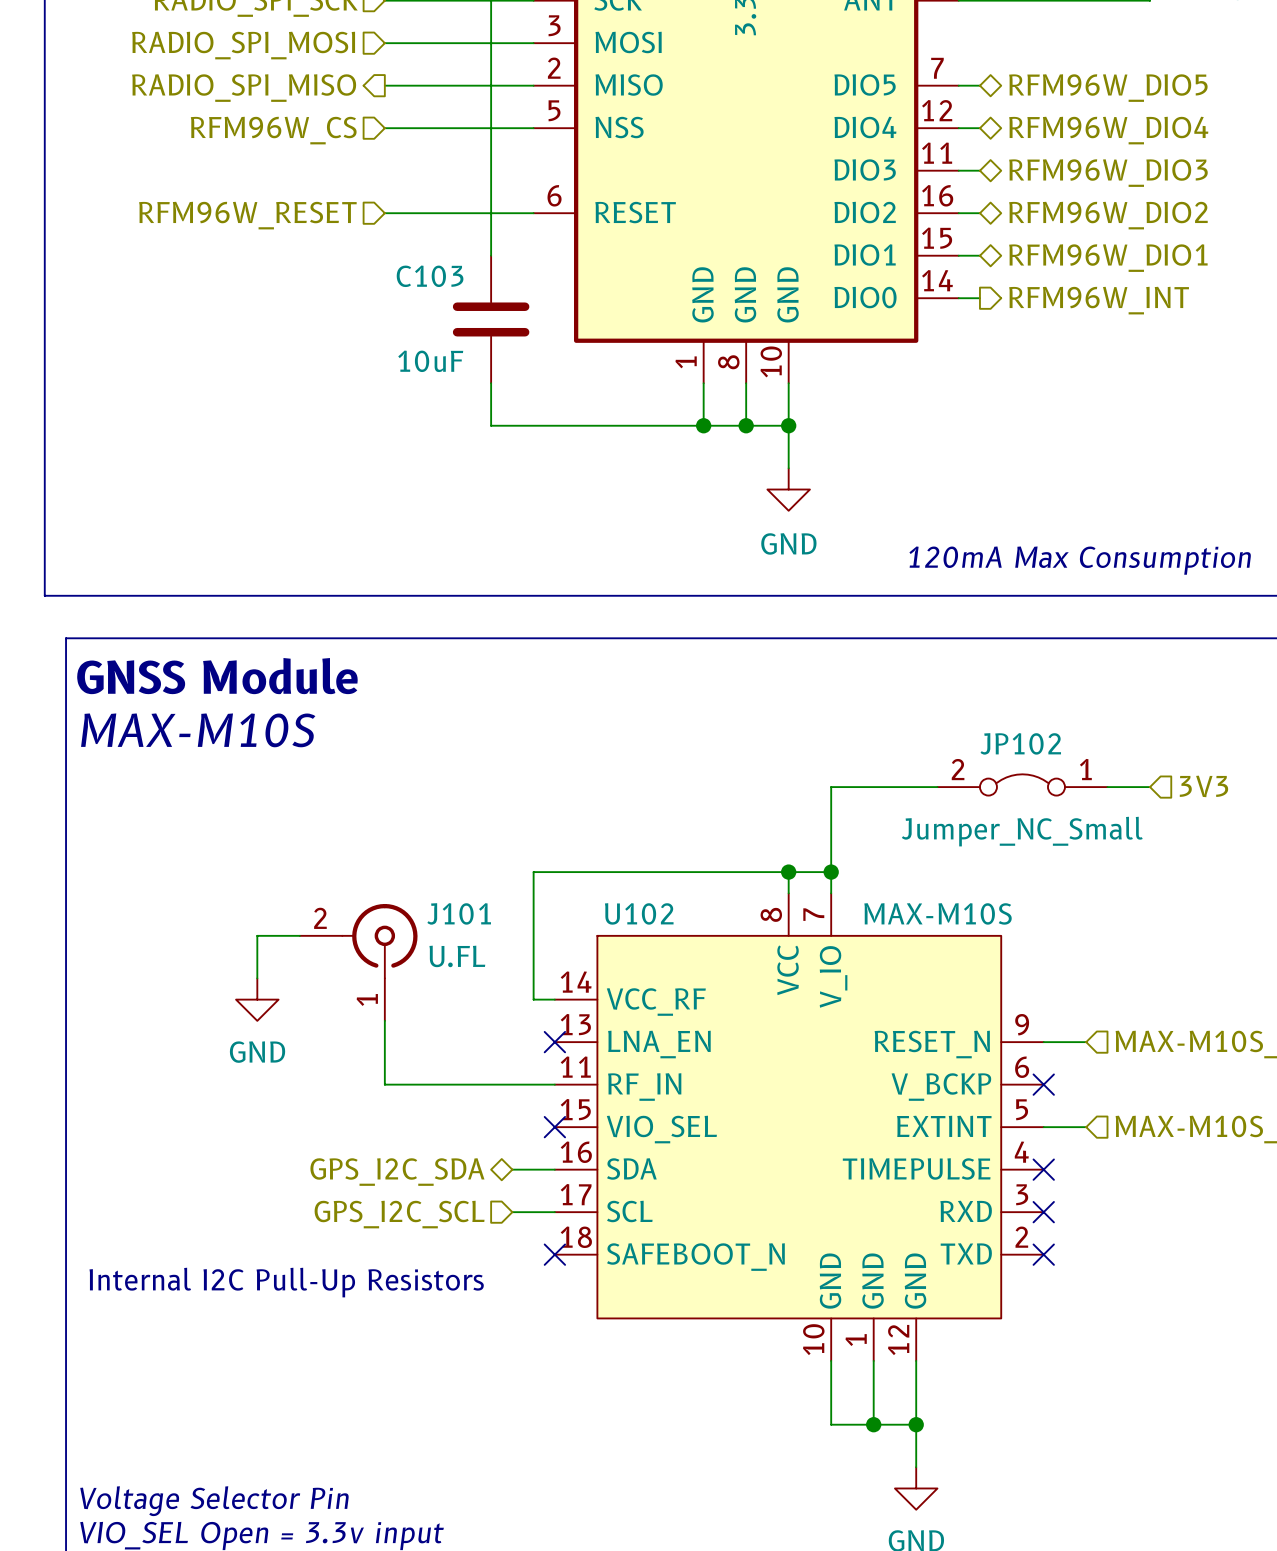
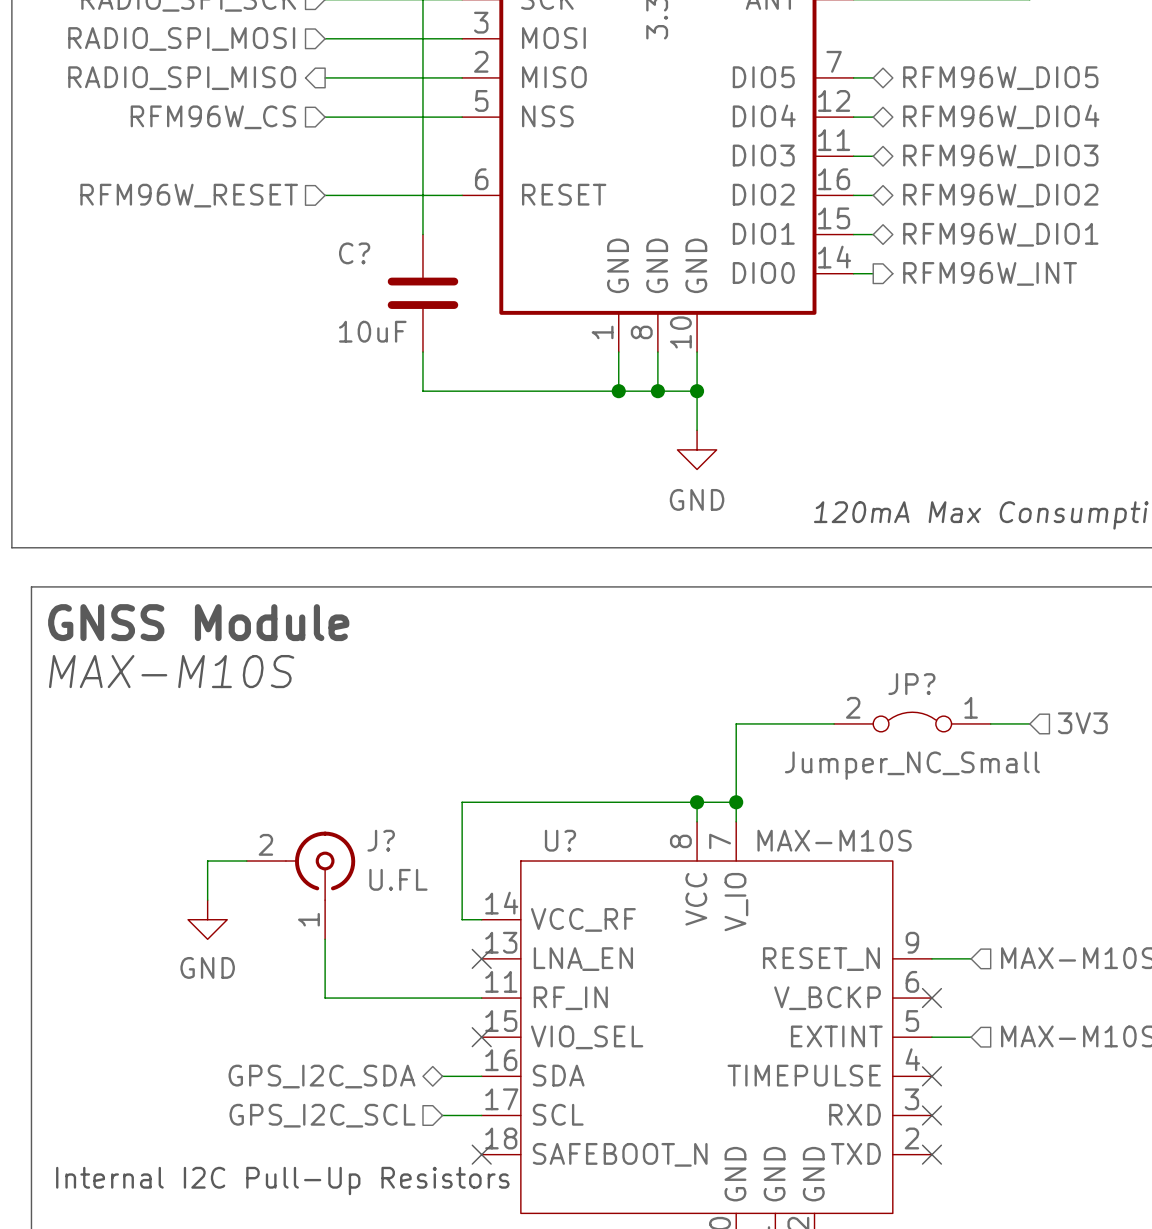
C103 name: C103 (430, 276) -> C? (354, 253)
JP102 name: JP102 (1020, 743) -> JP? (911, 684)
J101 name: J101 (459, 913) -> J? (381, 840)
U102 name: U102 (639, 913) -> U? (560, 840)

